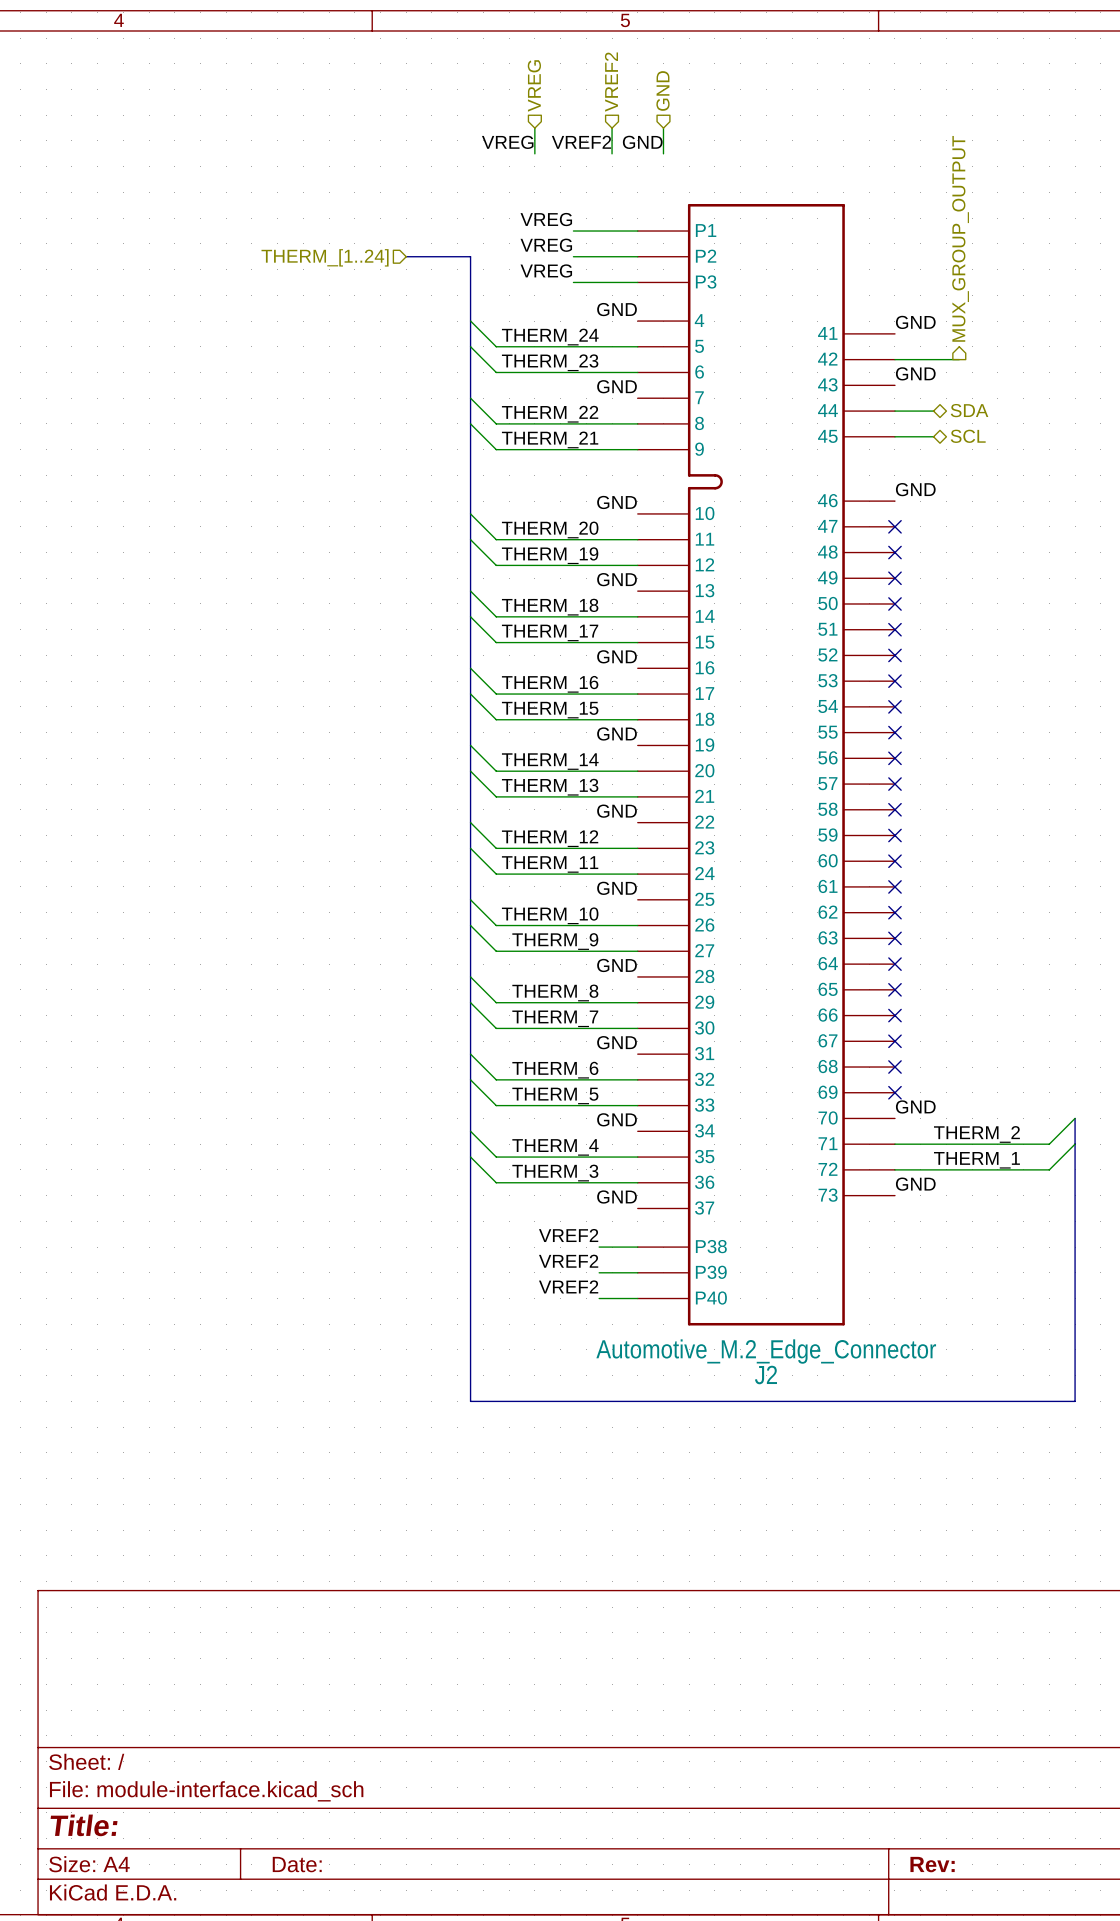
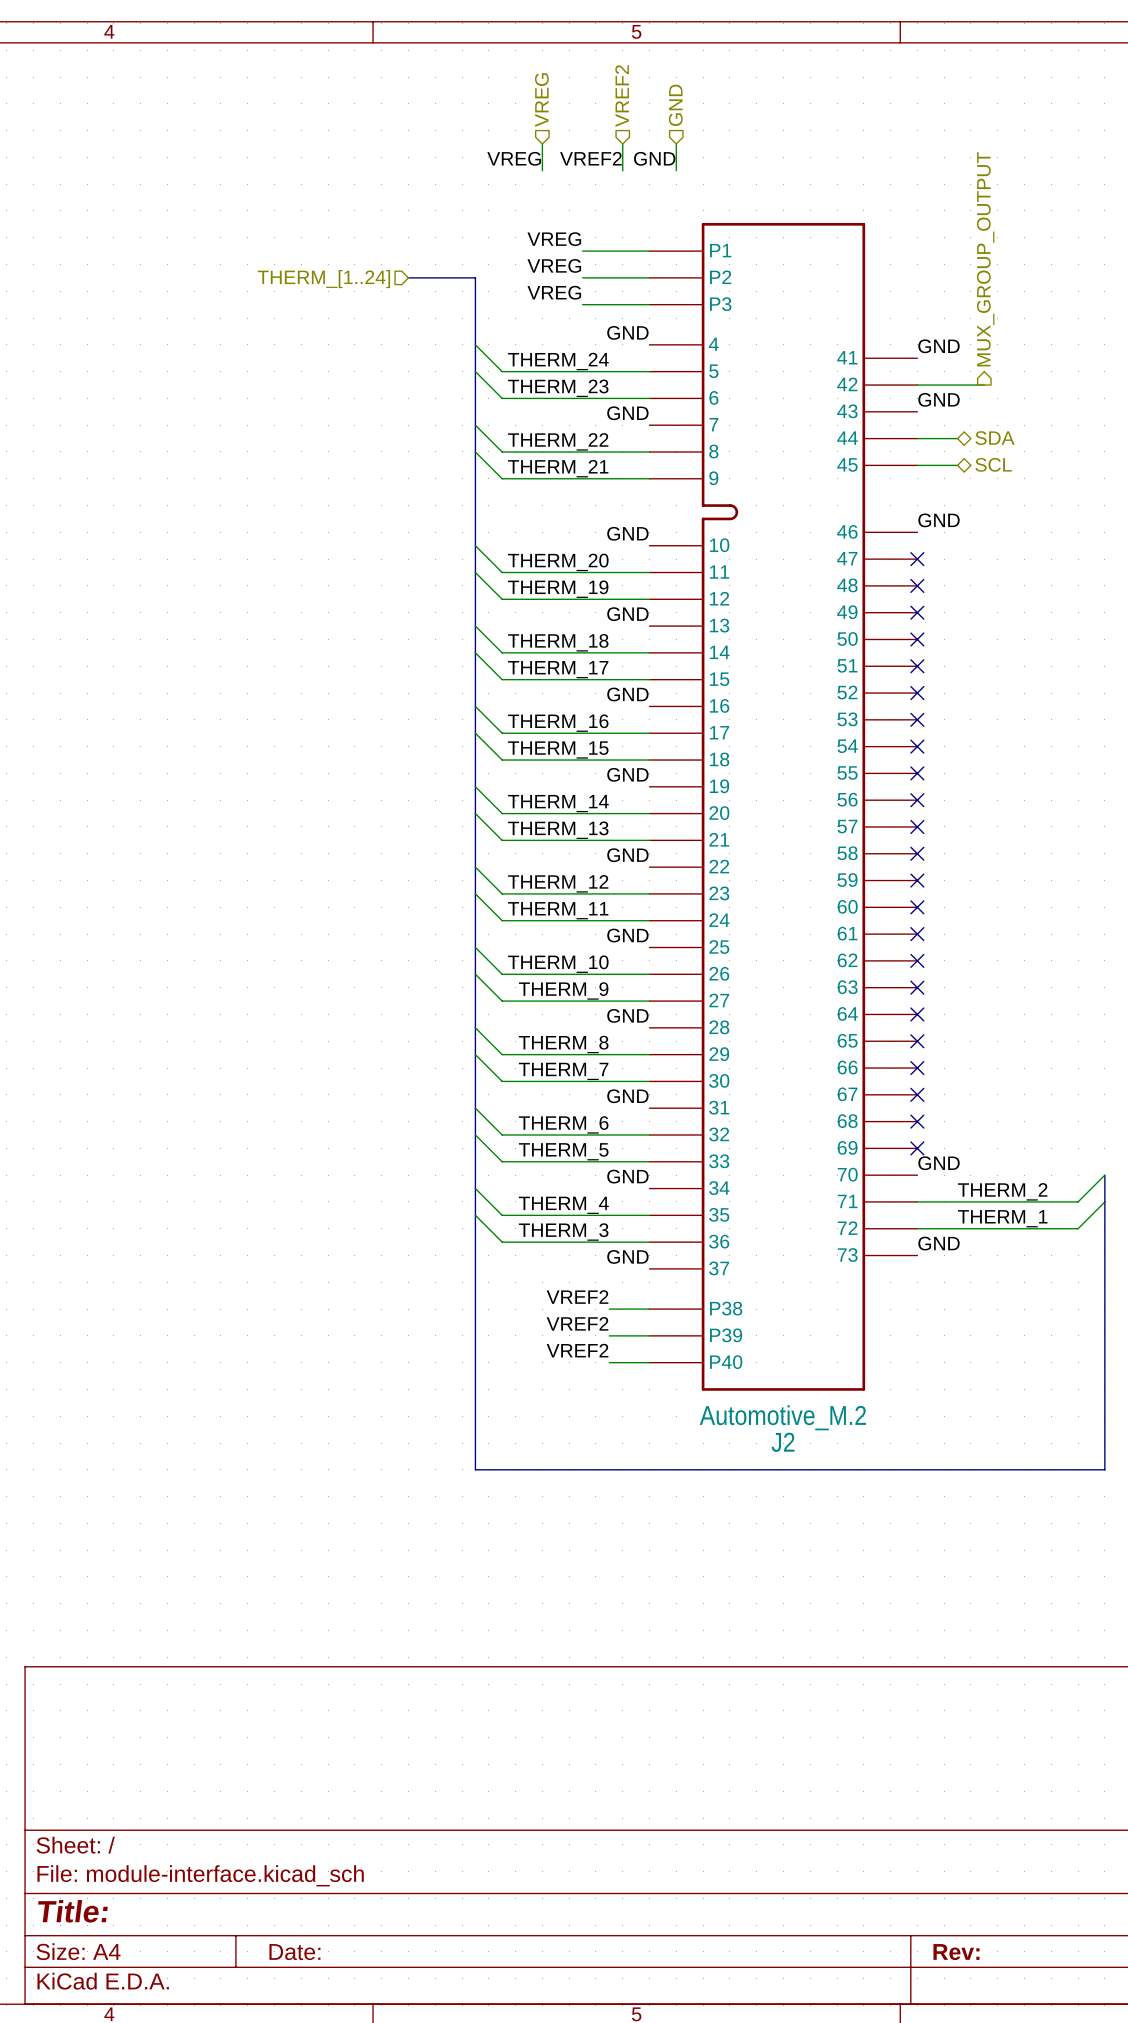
J2 value: Automotive_M.2_Edge_Connector (766, 1351) -> Automotive_M.2 (782, 1417)

